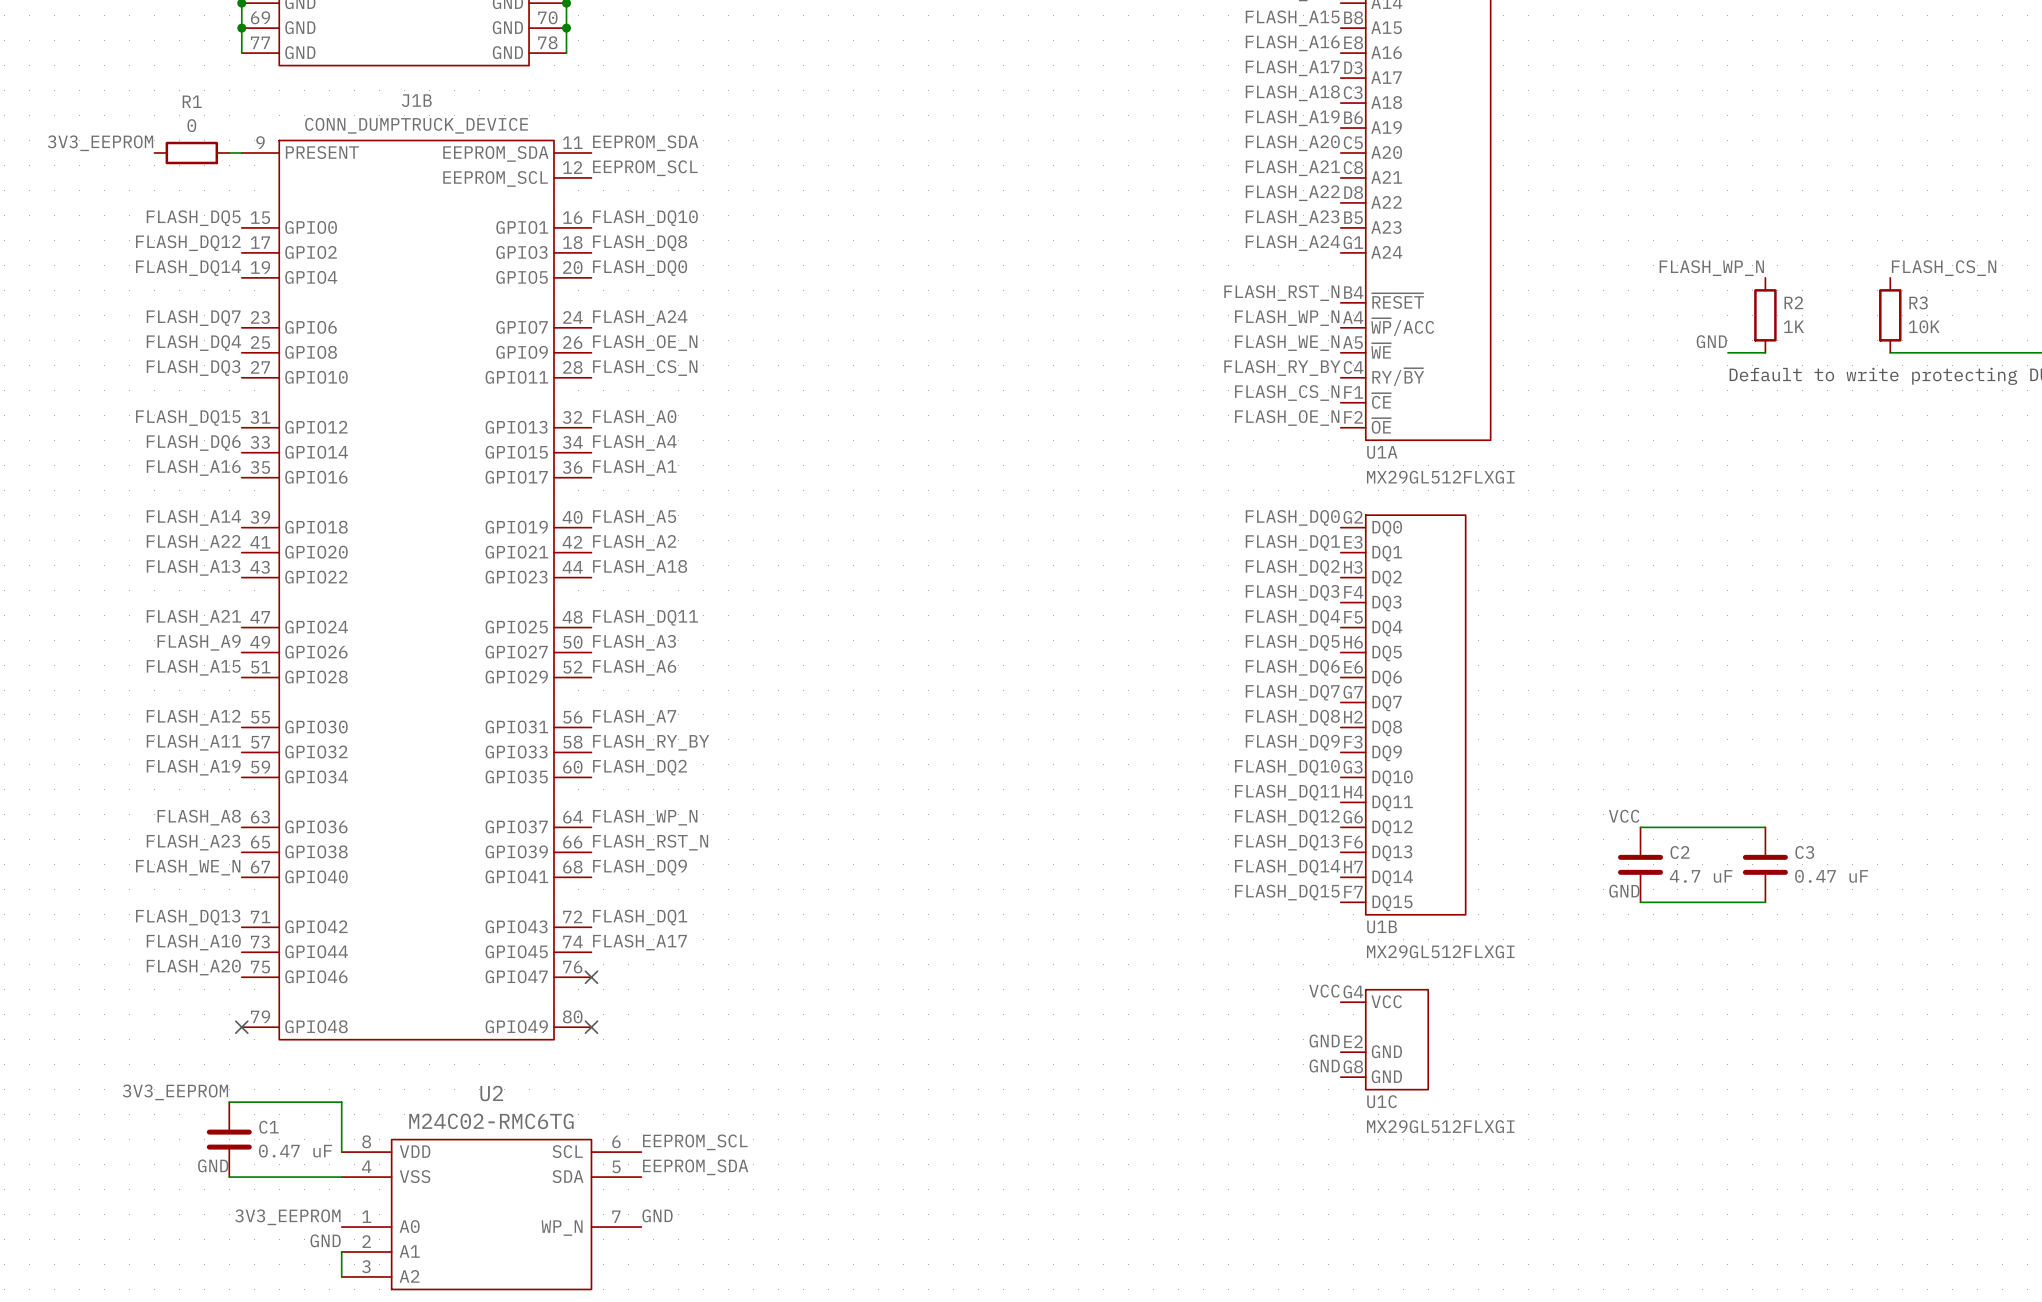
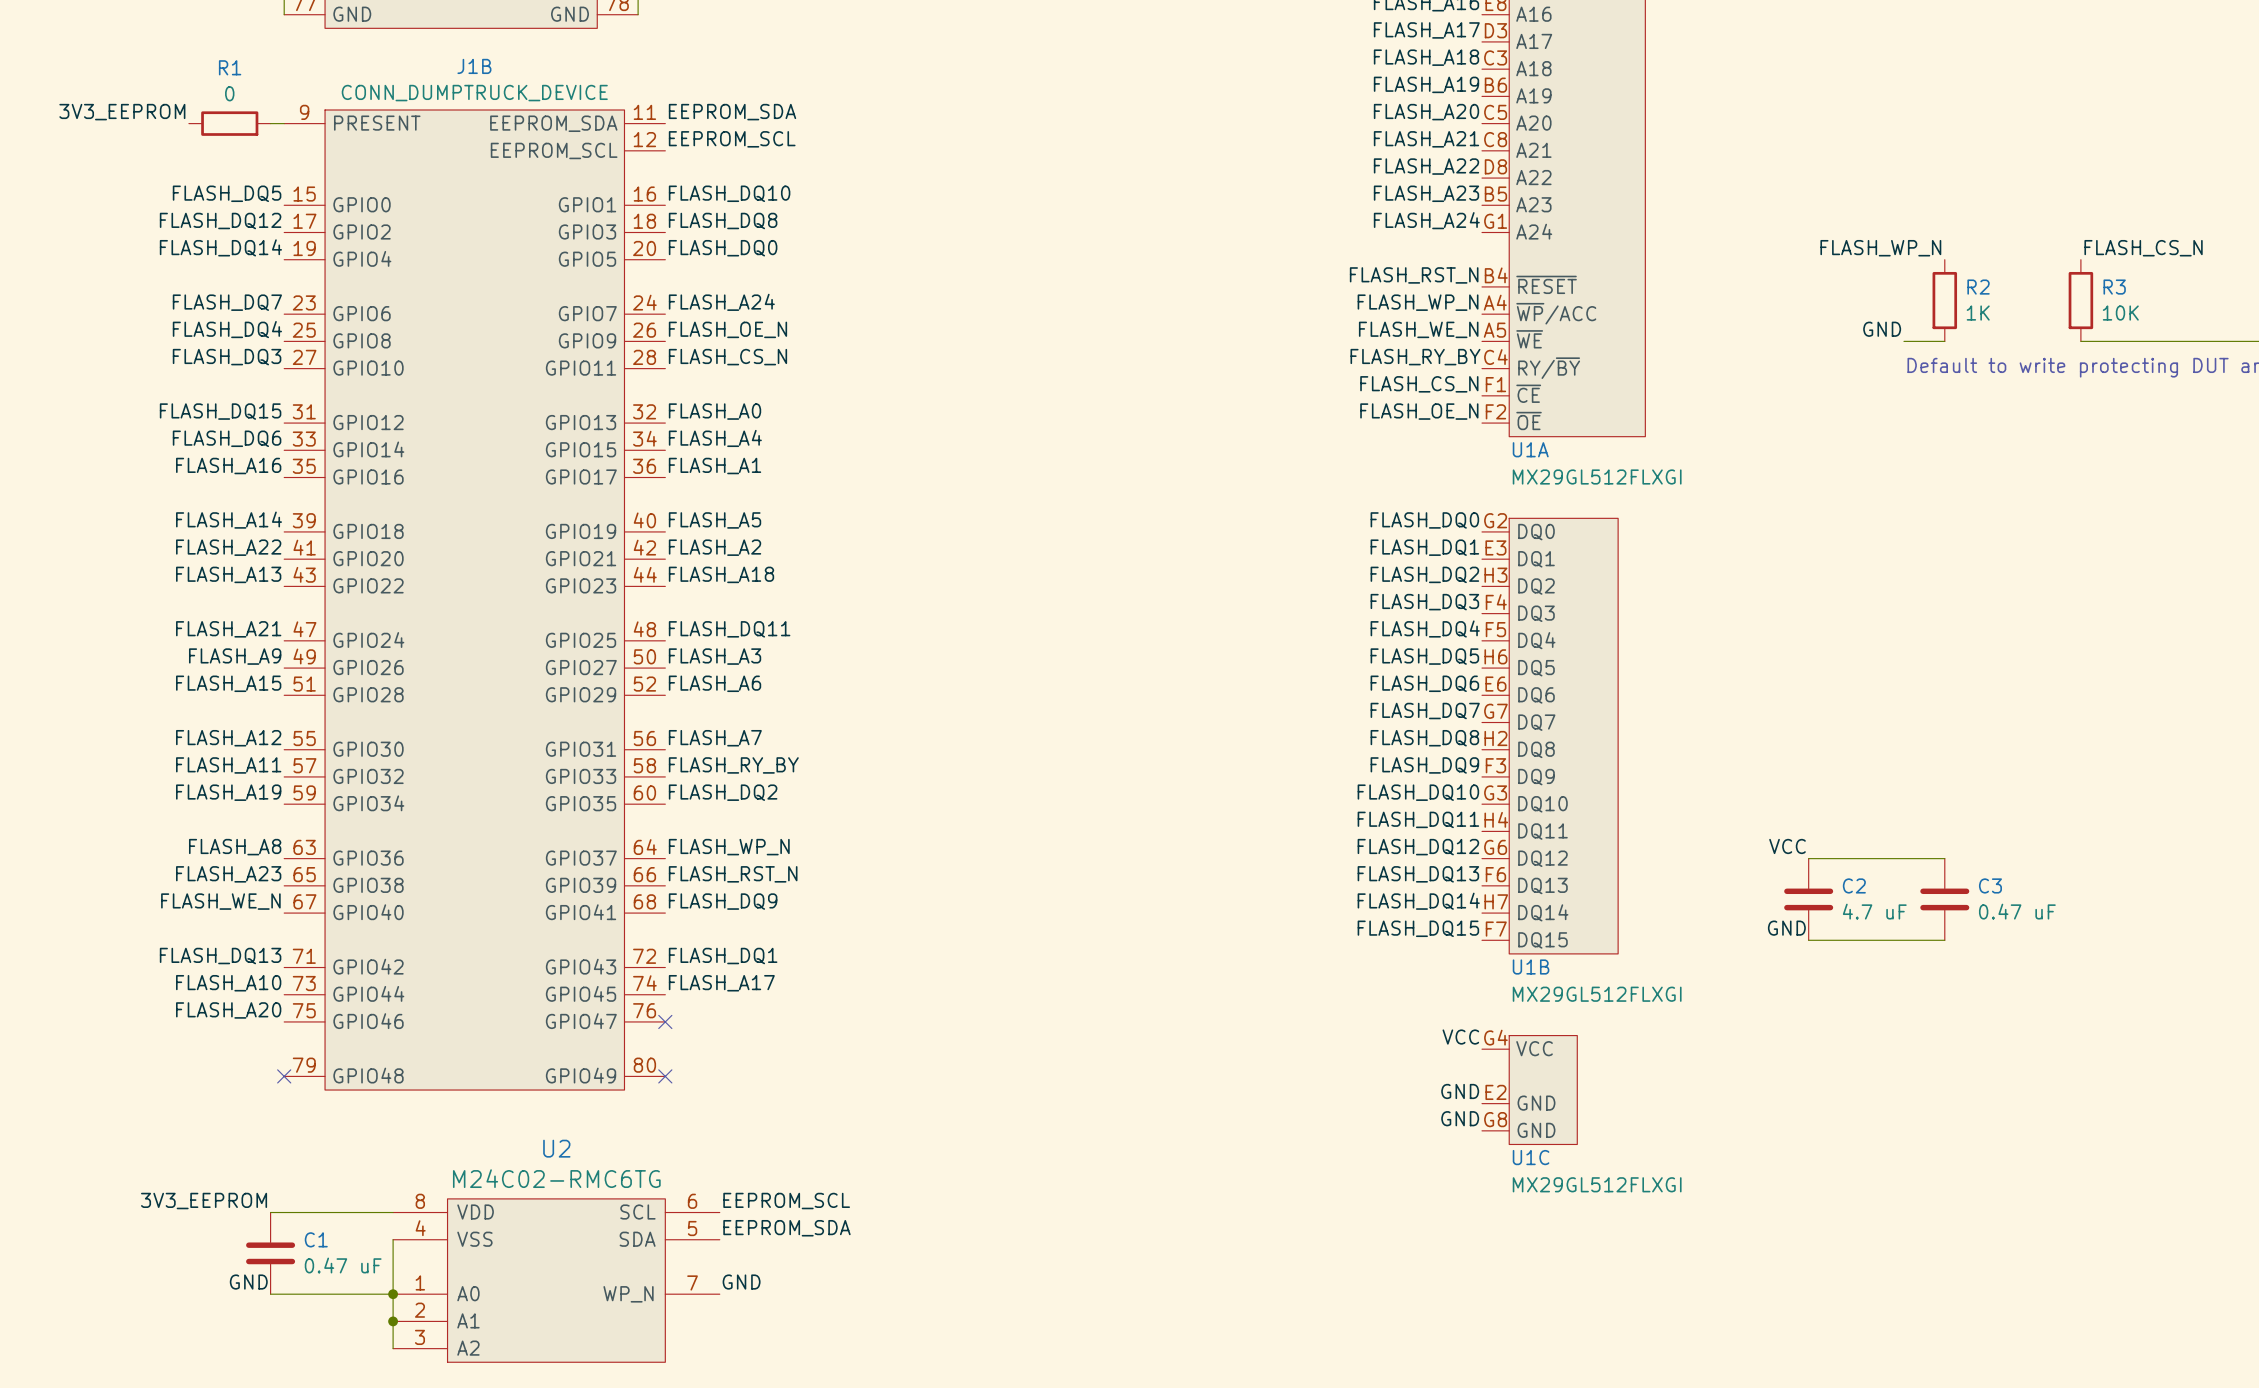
label position: 3V3_EEPROM (175, 1092) -> 3V3_EEPROM (204, 1201)
wire: (229, 1102) (341, 1102) (341, 1152) -> (270, 1212) (393, 1212)
C1 position: (229, 1139) -> (270, 1253)
label position: GND (213, 1165) -> GND (248, 1282)
wire: (229, 1177) (341, 1177) -> (393, 1321) (393, 1239)
label: 3V3_EEPROM (287, 1217) -> none
wire: none -> (270, 1294) (393, 1294)
junction: none -> (393, 1294)
label: GND (325, 1240) -> none
junction: none -> (393, 1321)

